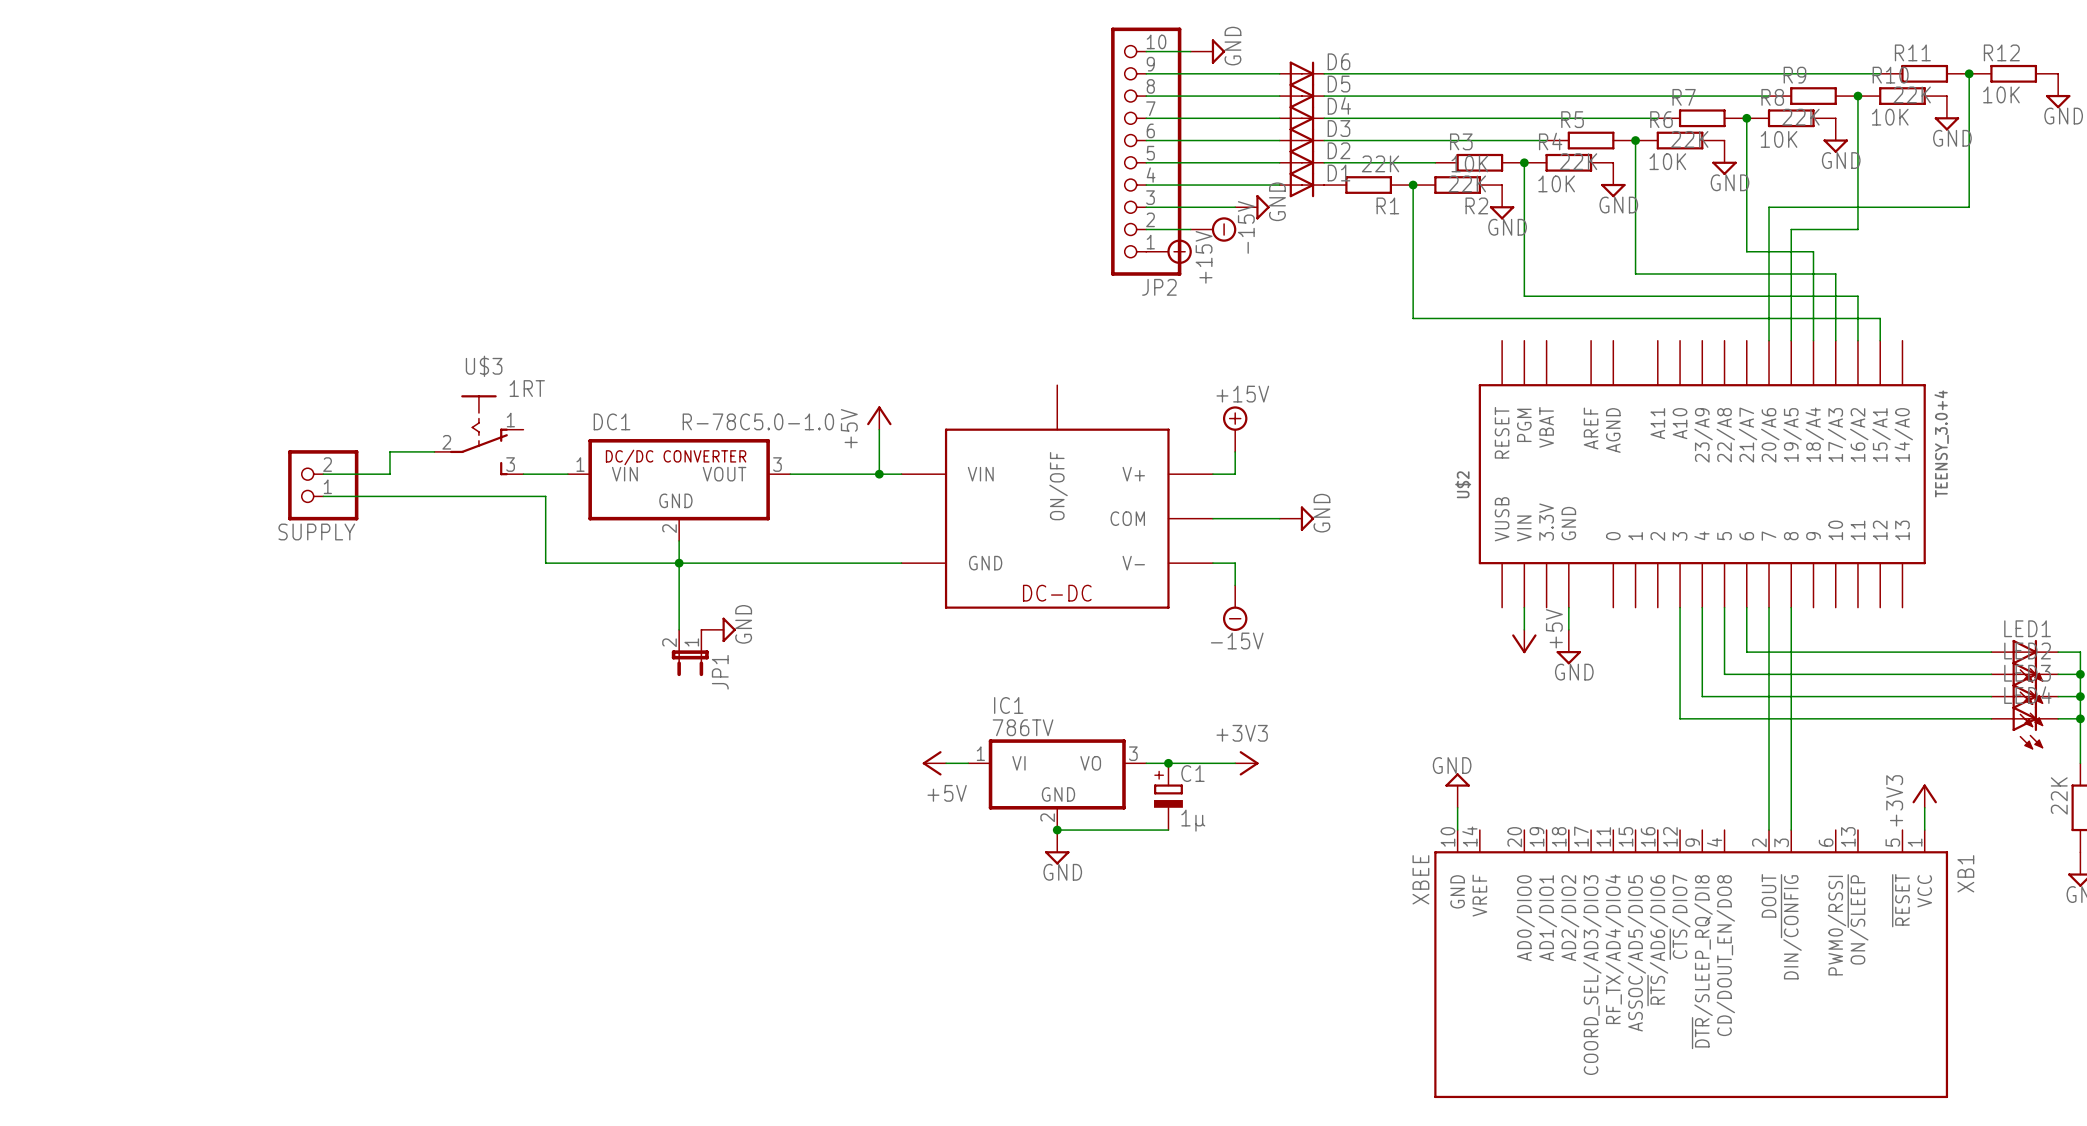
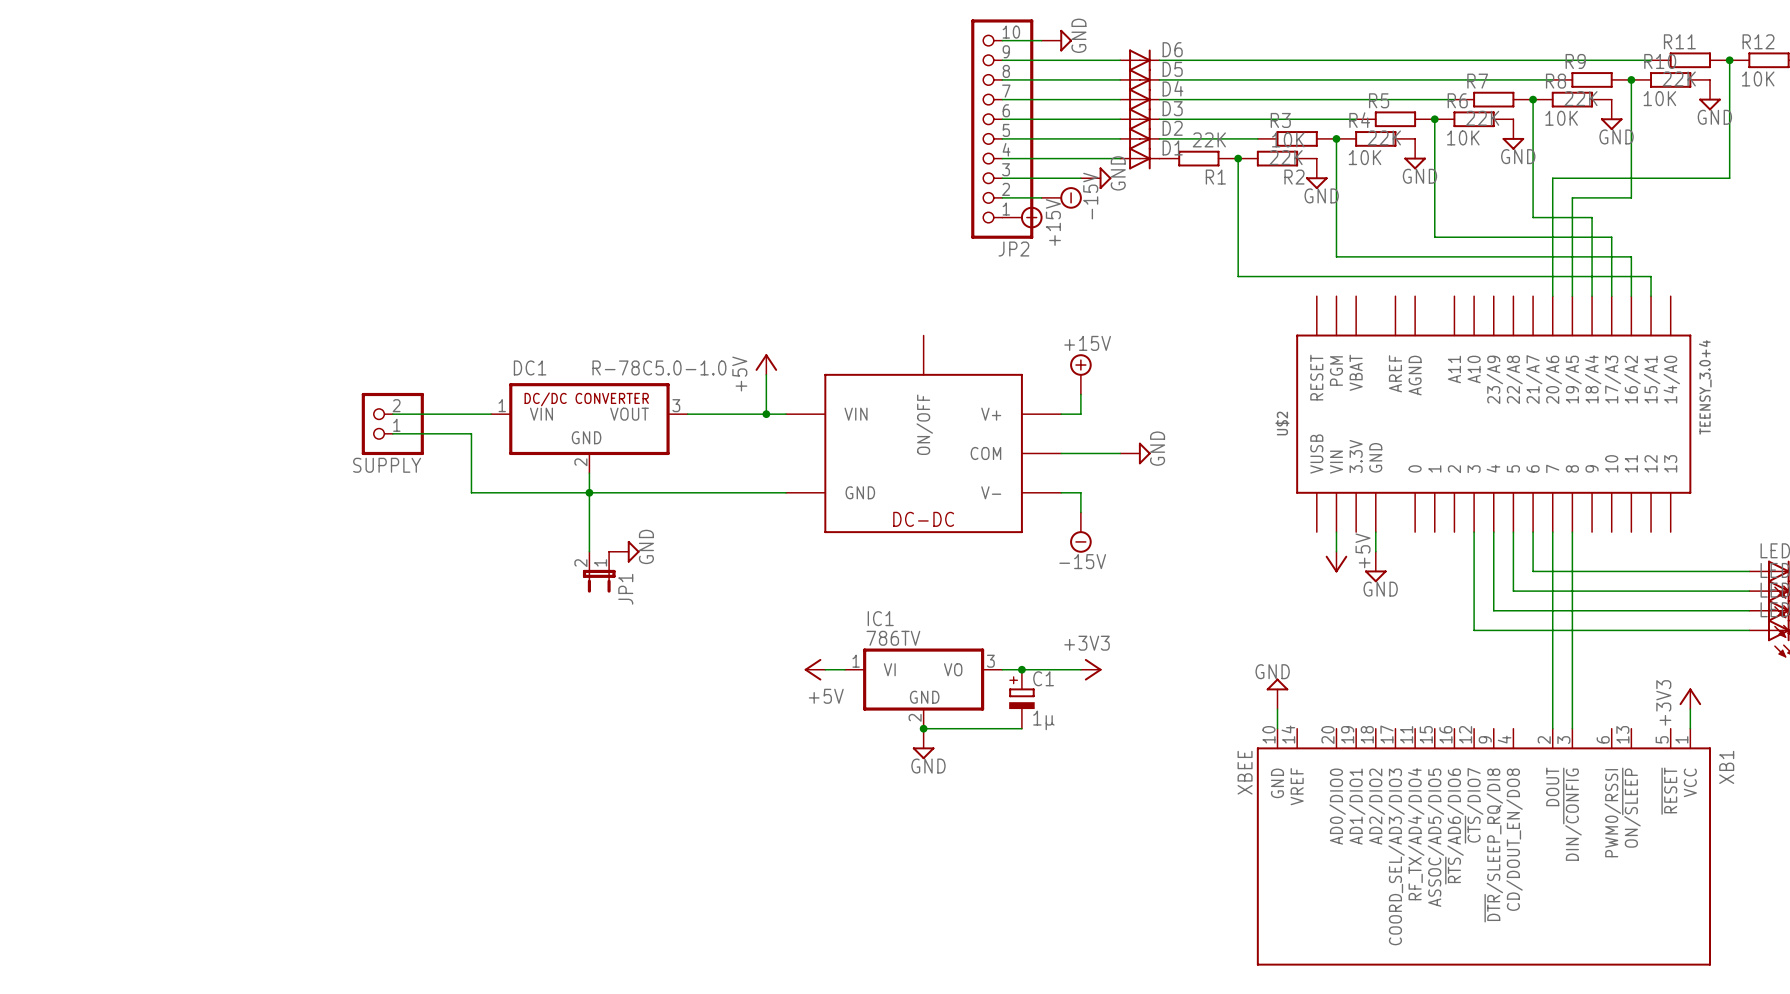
U$3: 1RT (478, 435) -> none
wire: (434, 451) (389, 451) (389, 474) (323, 474) -> none
wire: none -> (392, 414) (451, 414)
SUPPLY position: (323, 485) -> (392, 423)
wire: (323, 496) (456, 496) -> none

